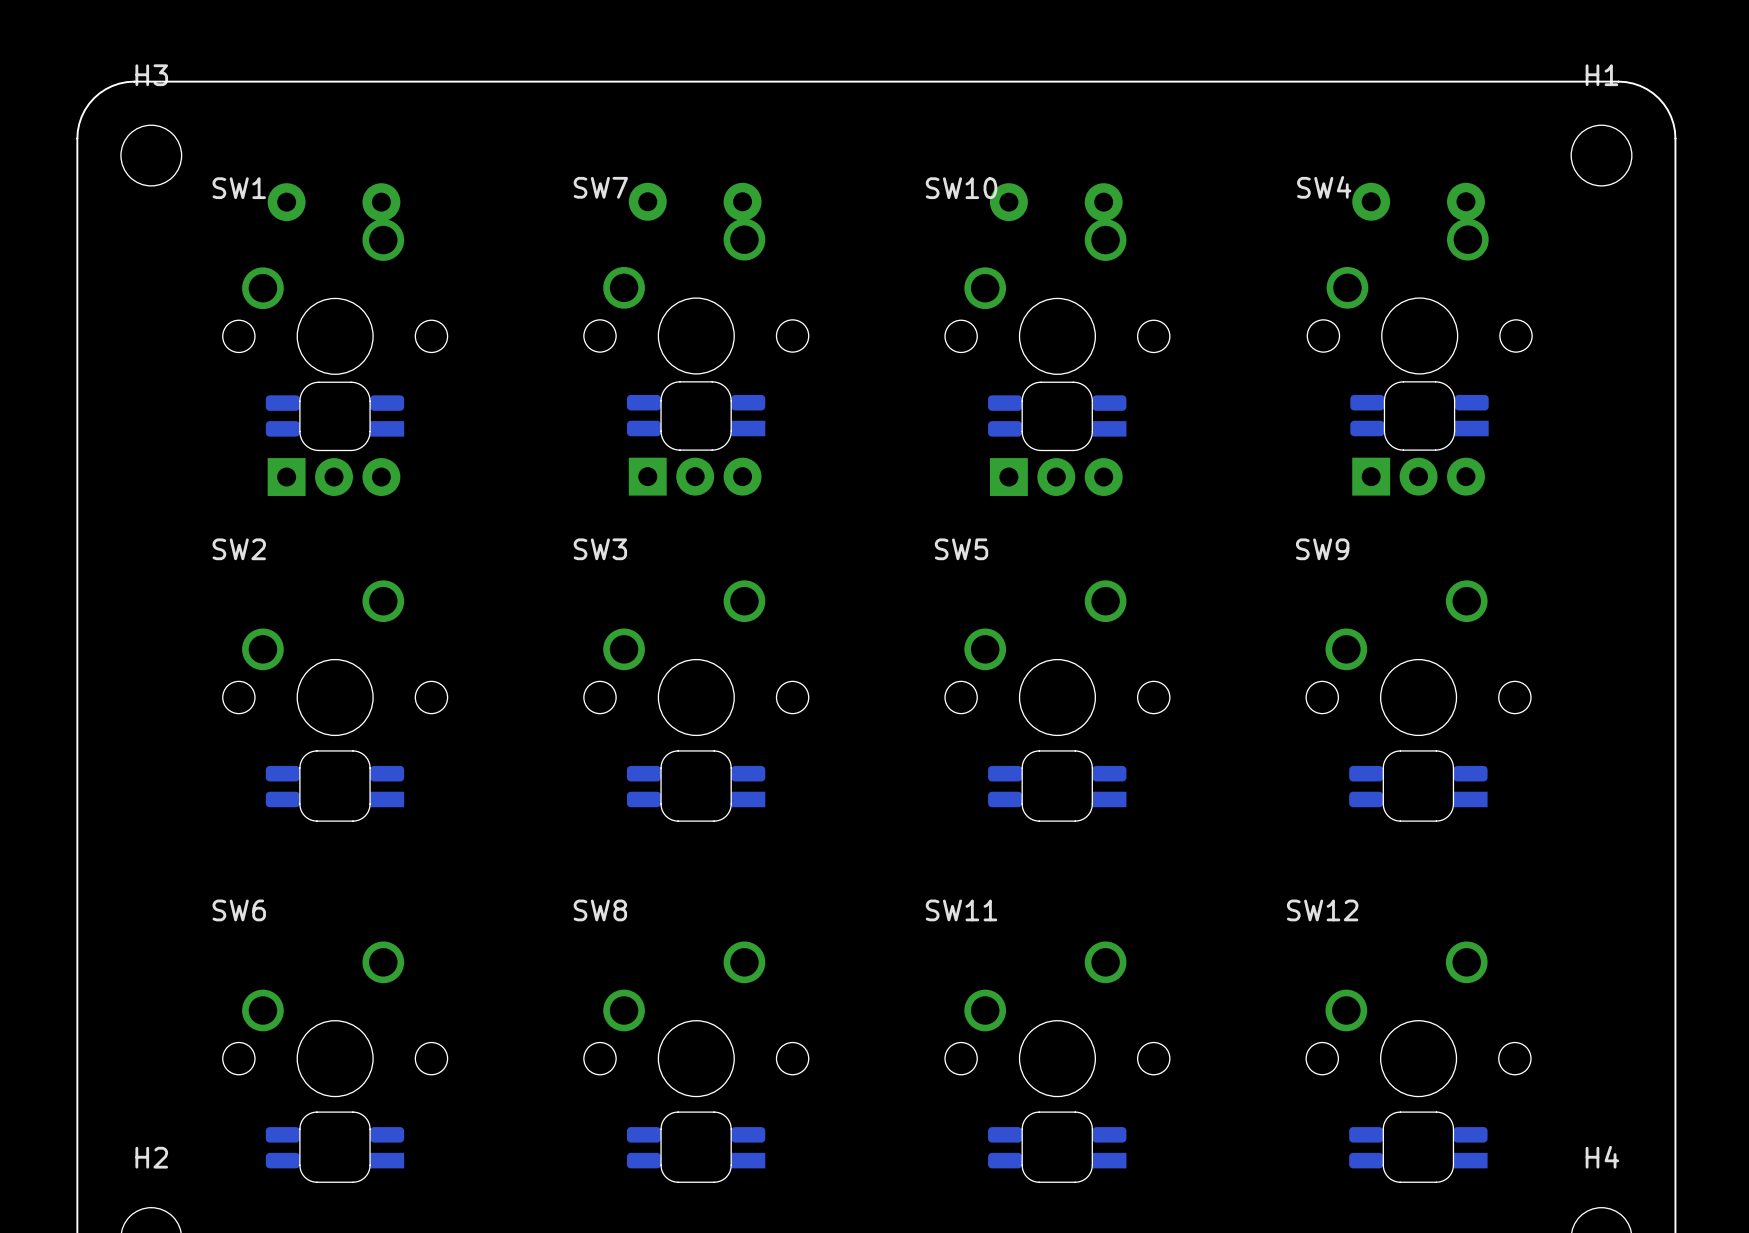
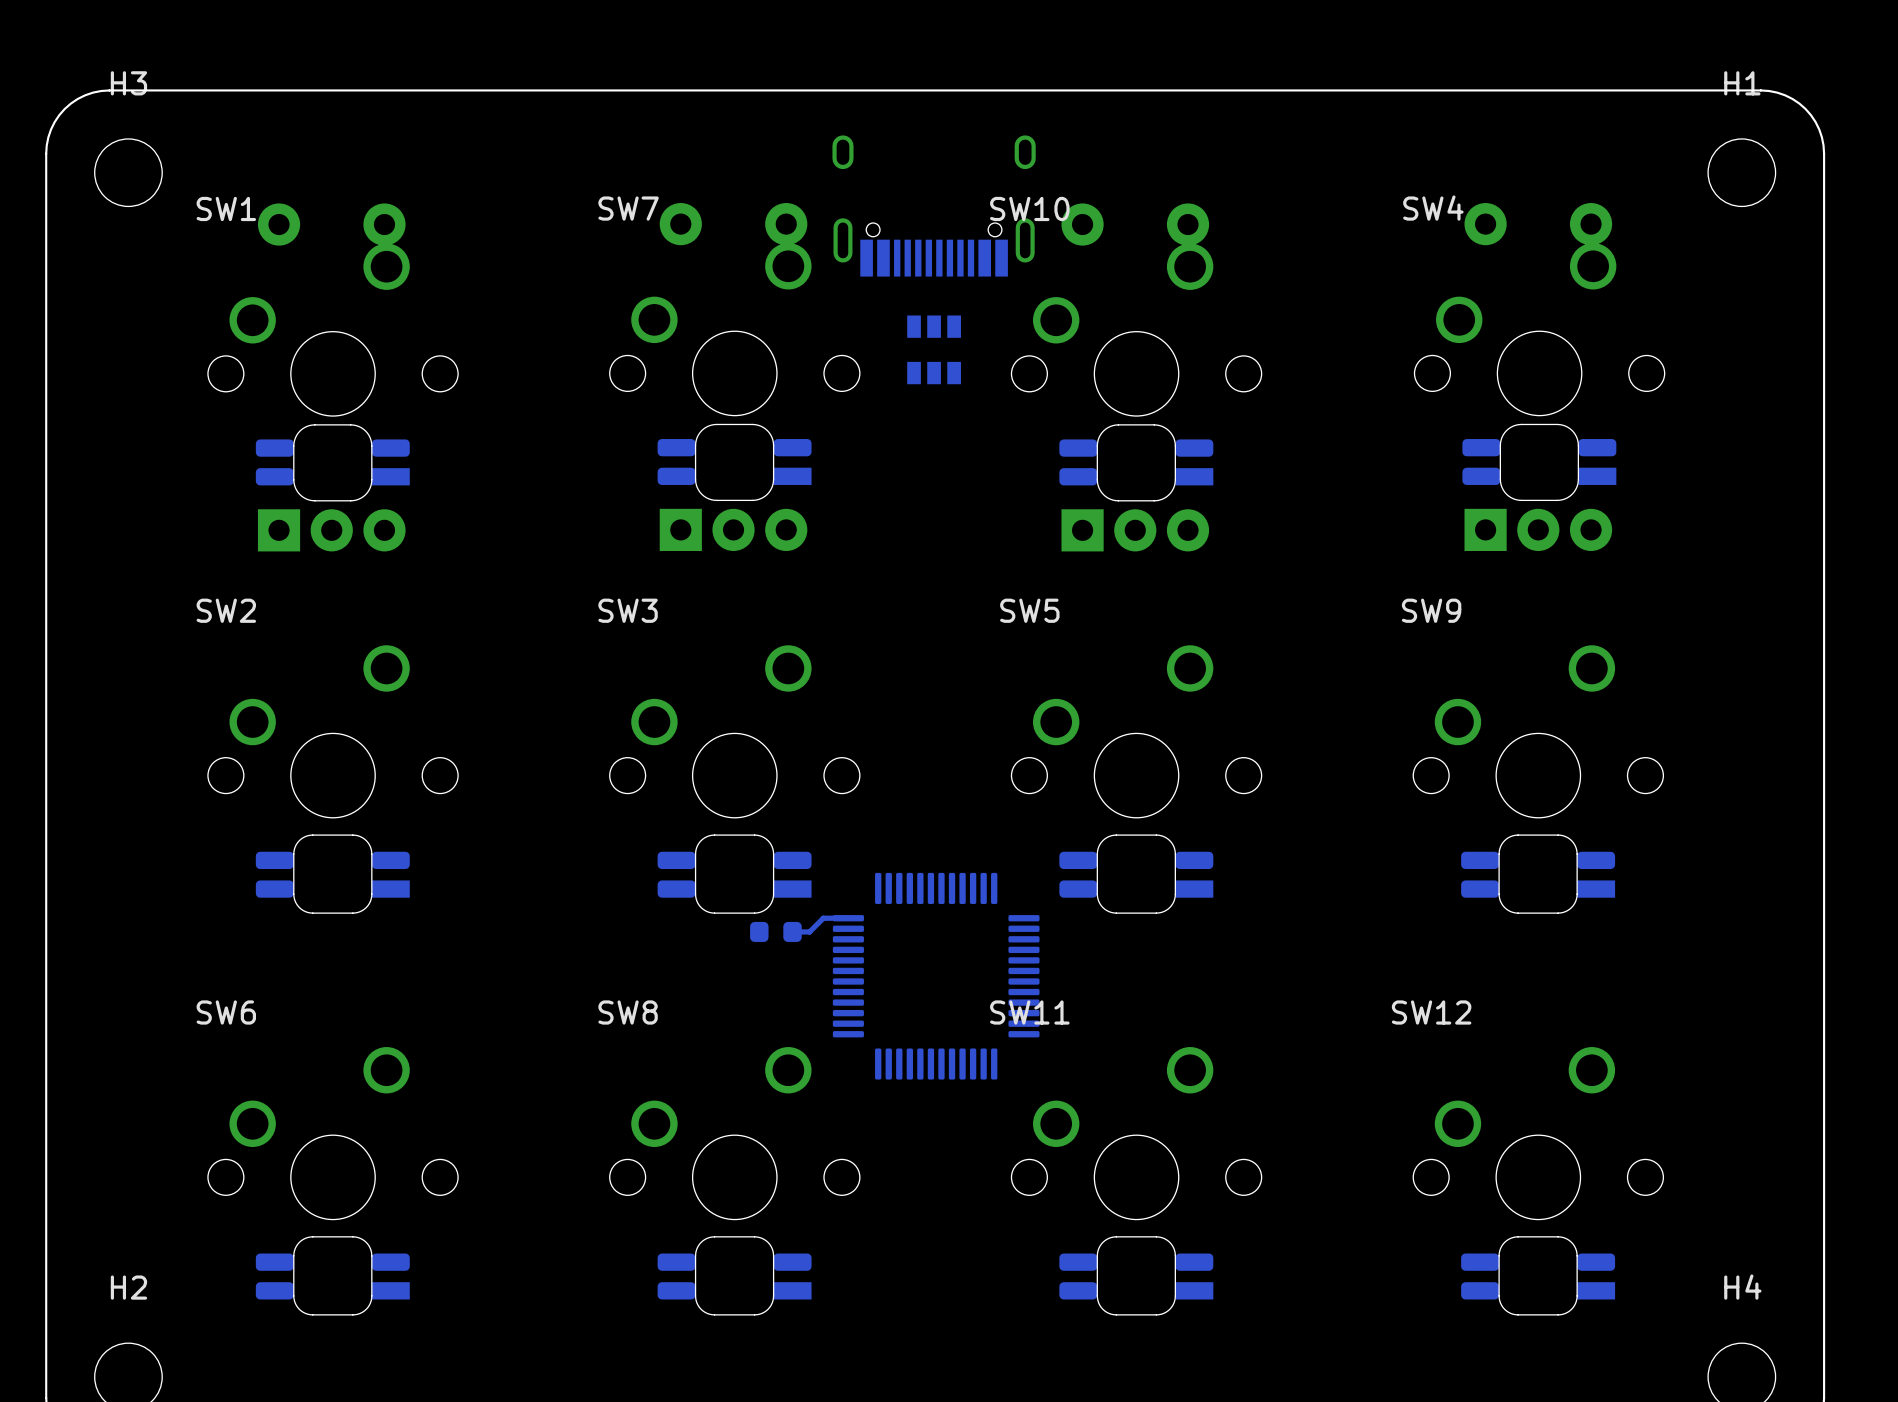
part: none -> (934, 205)
part: none -> (934, 349)
bottom track: none -> (848, 918) (823, 918) (809, 931) (792, 931)
part: none -> (775, 931)
part: none -> (936, 976)

